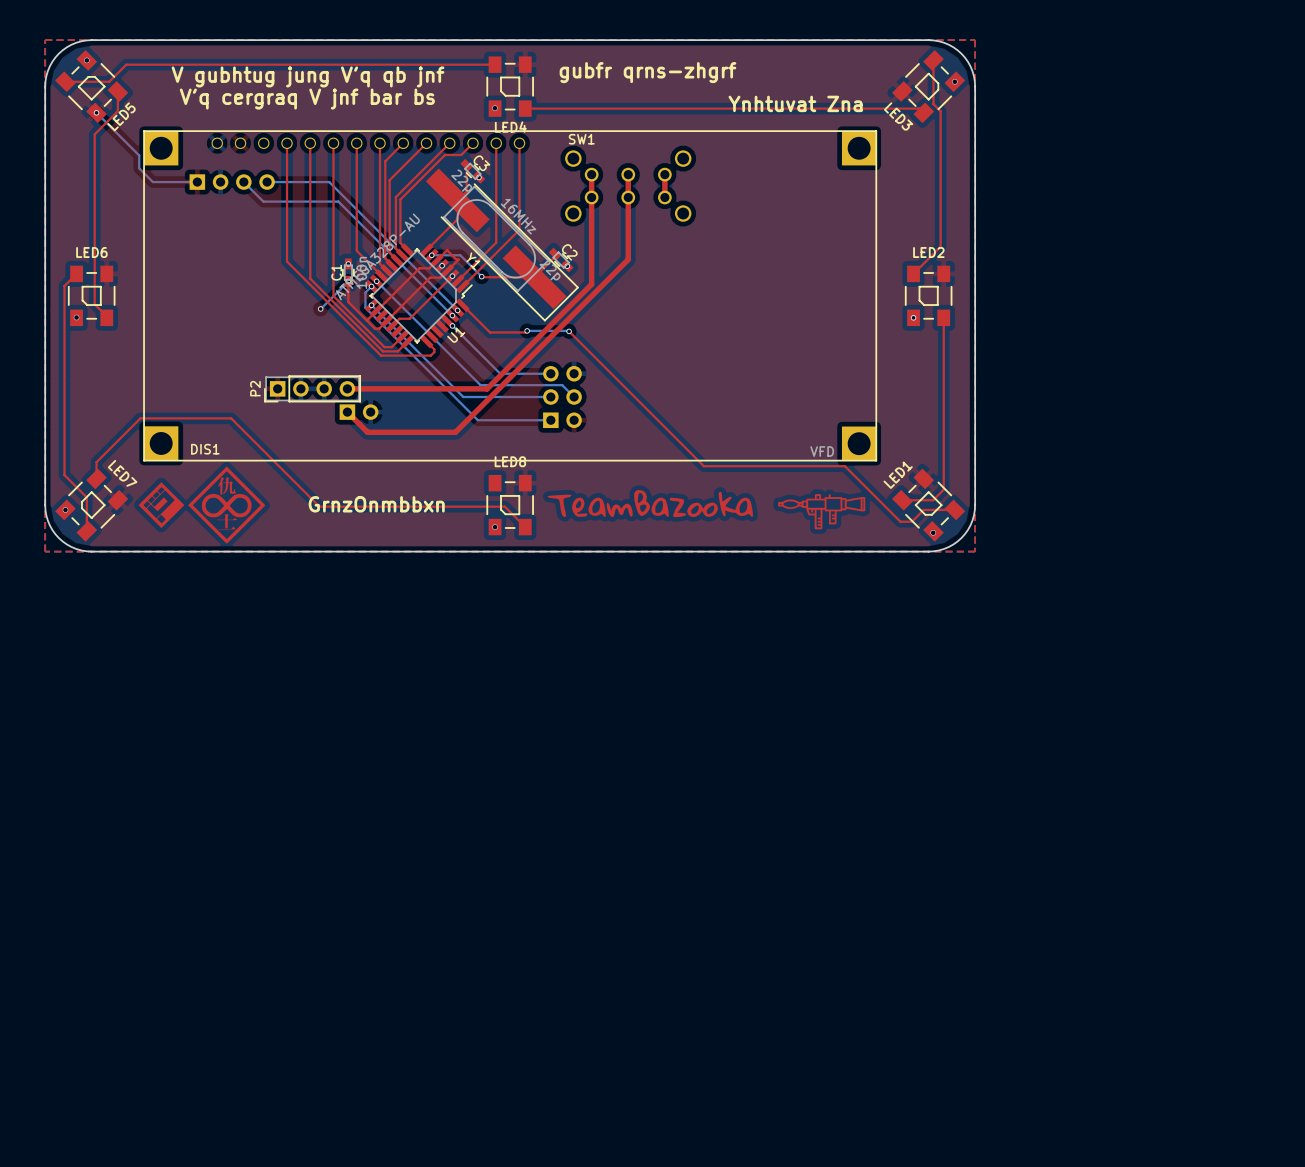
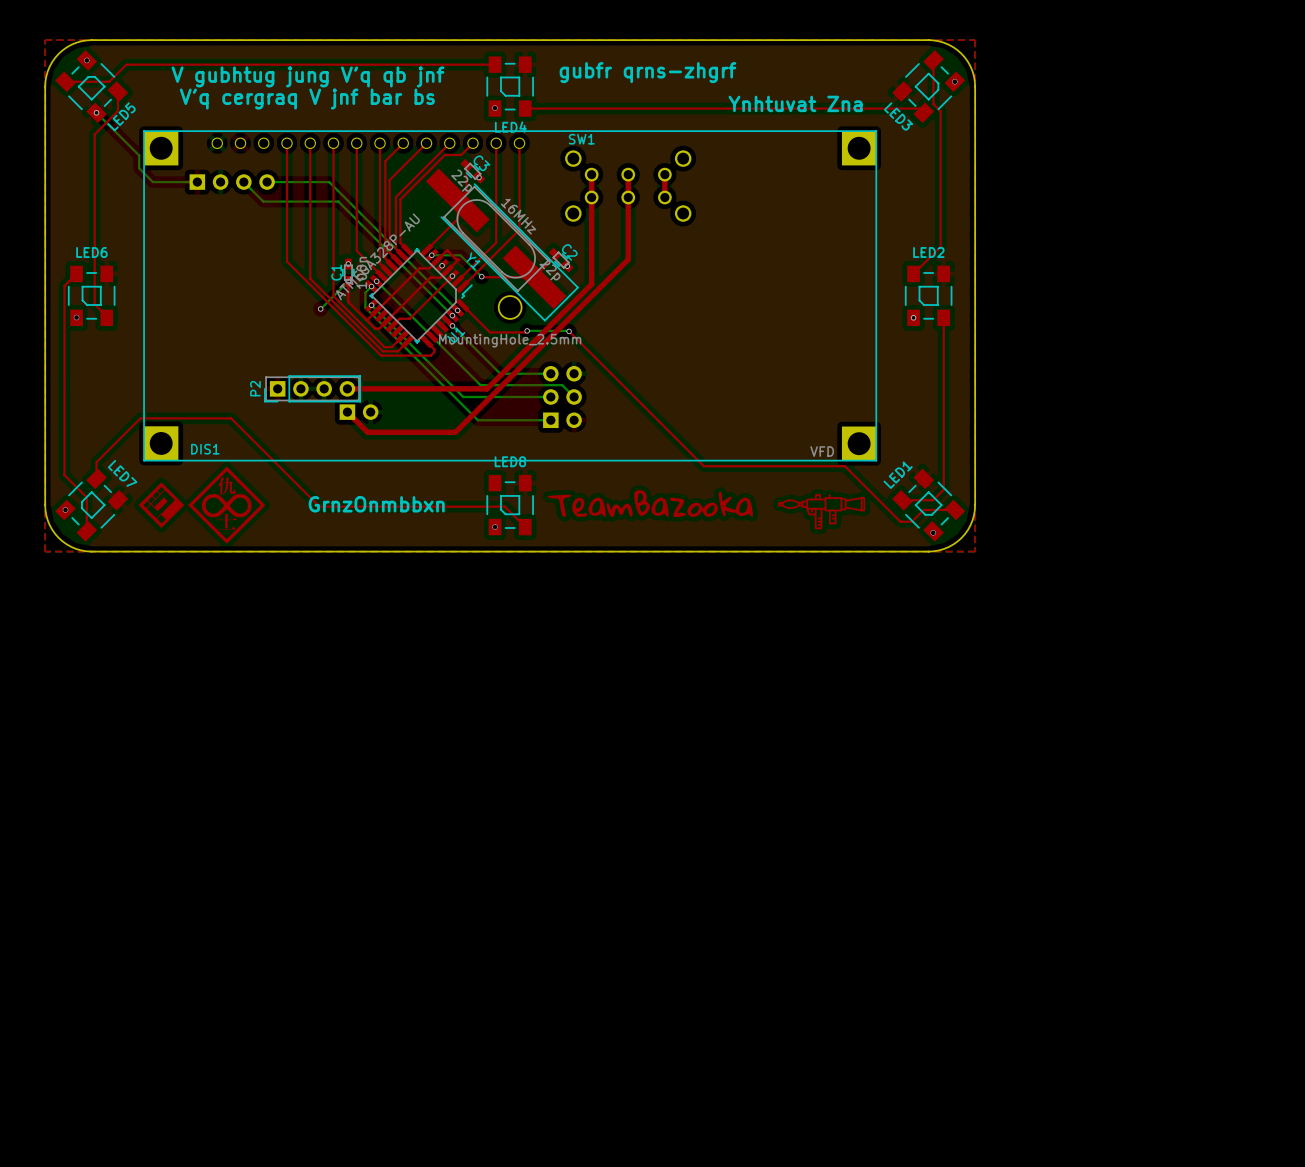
part: none -> MountingHole_2.5mm (510, 307)

